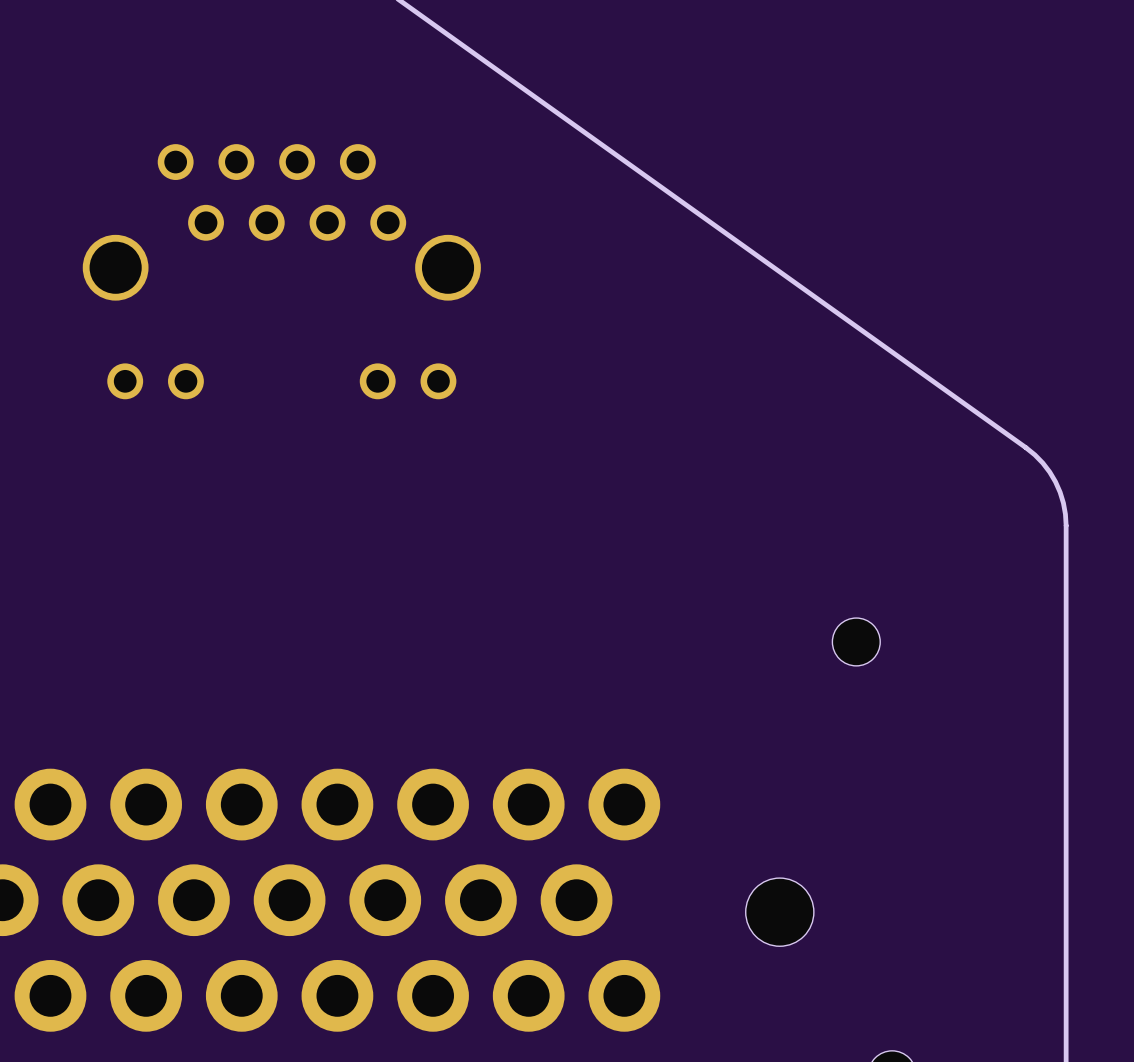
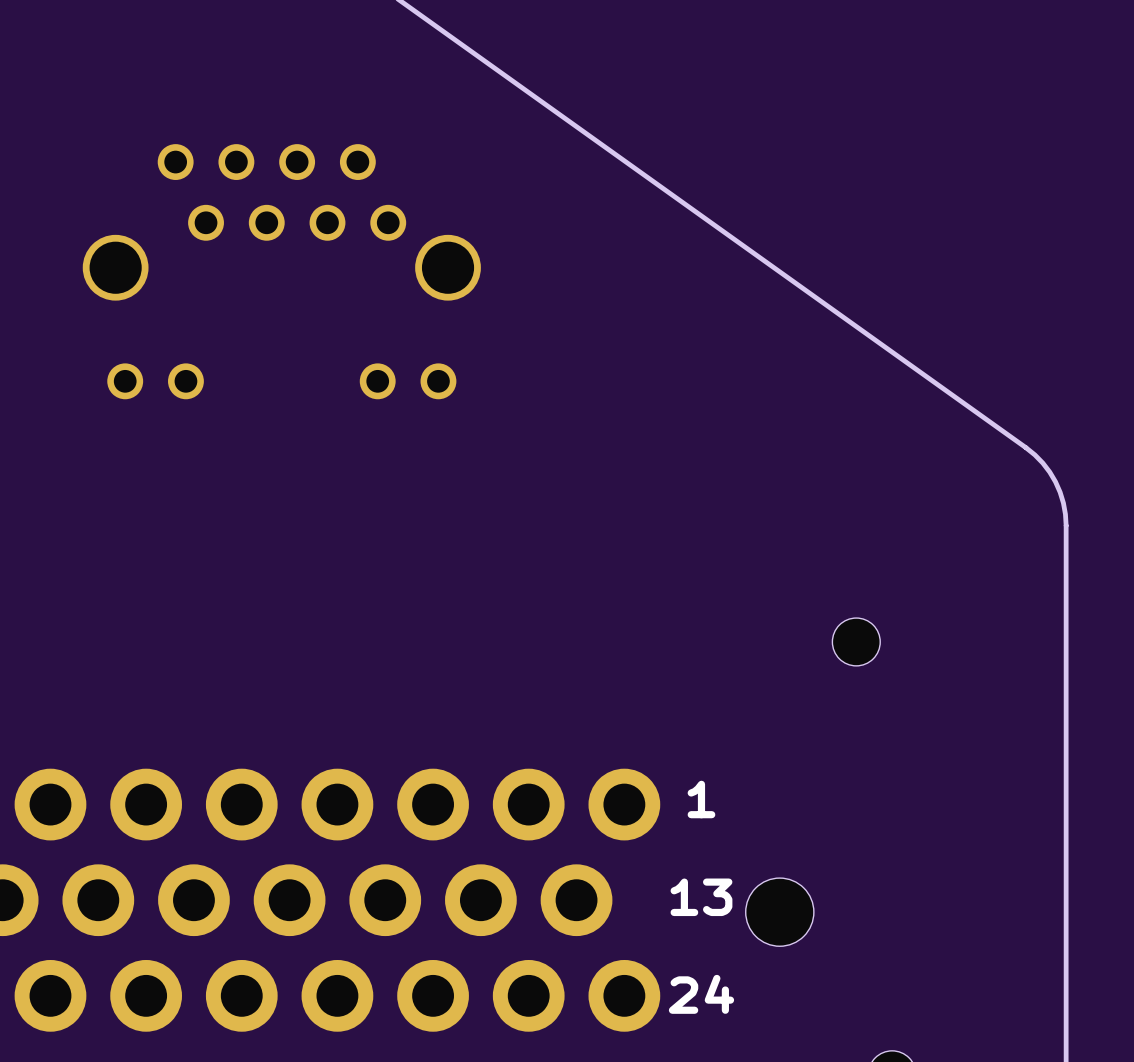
text: none -> 1 (701, 799)
text: none -> 13 (701, 897)
text: none -> 24 (701, 994)

